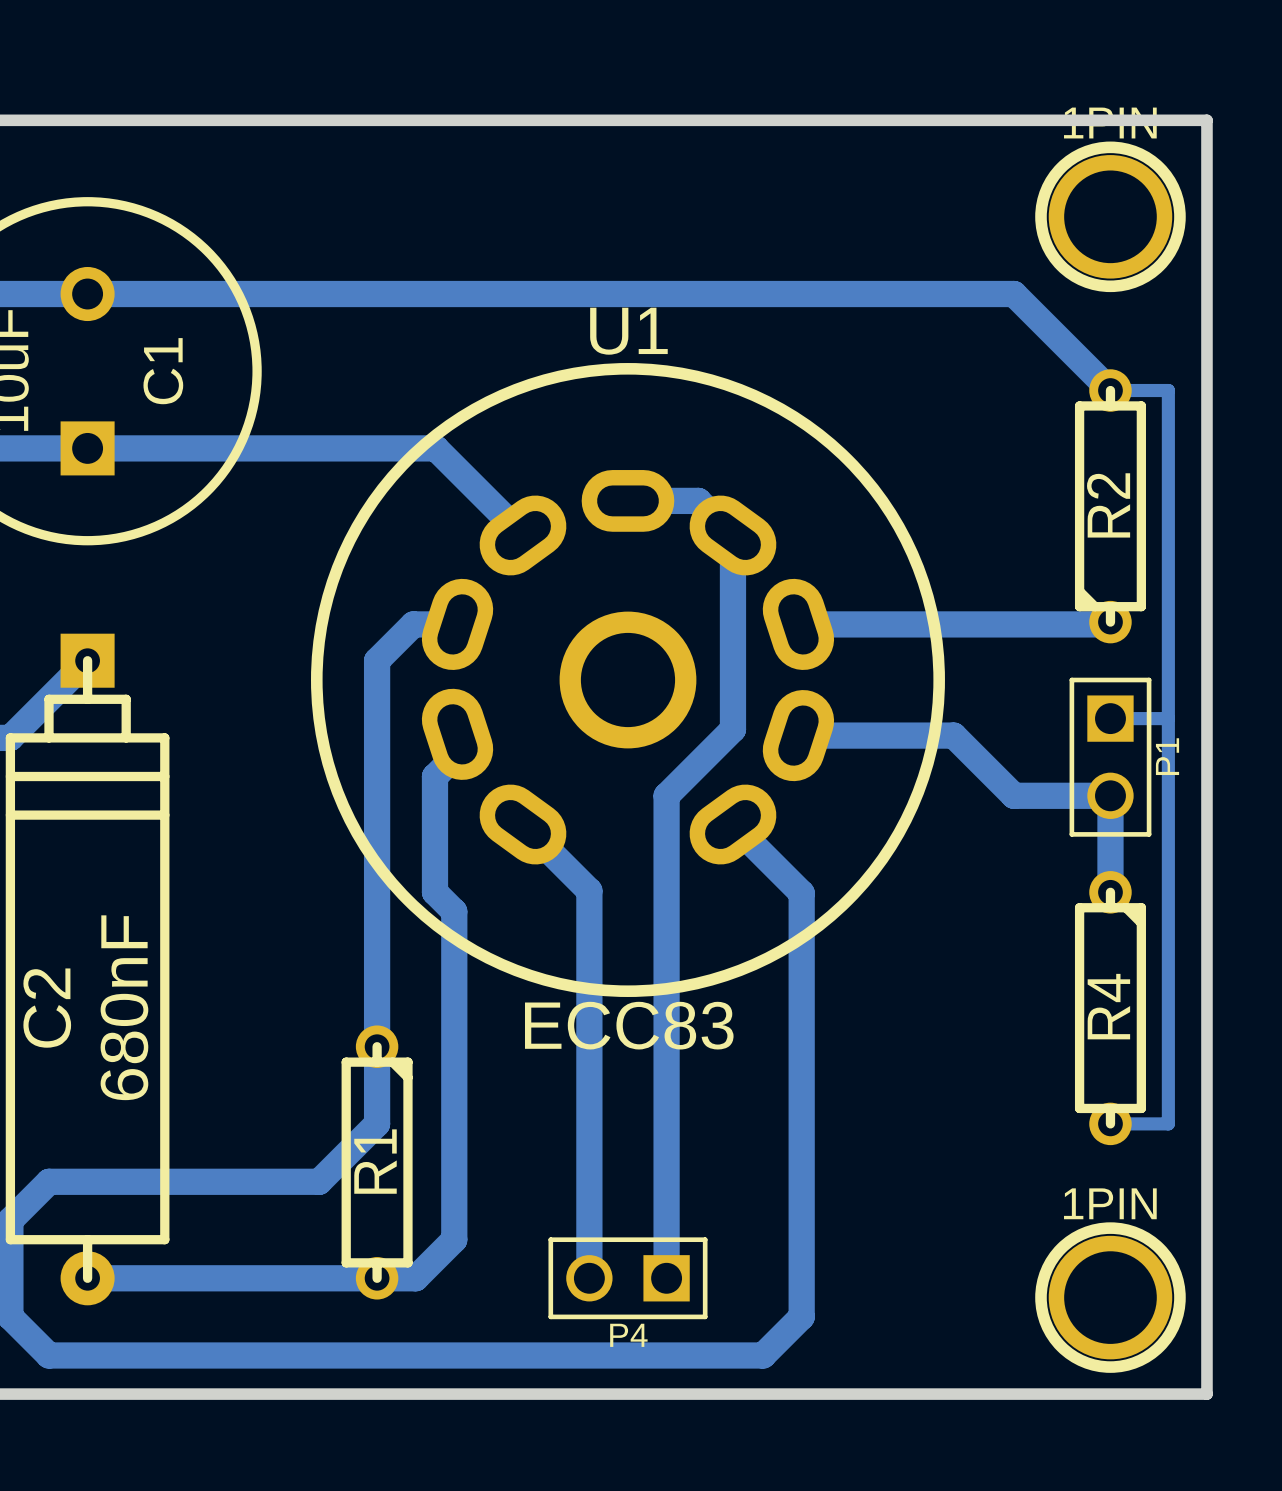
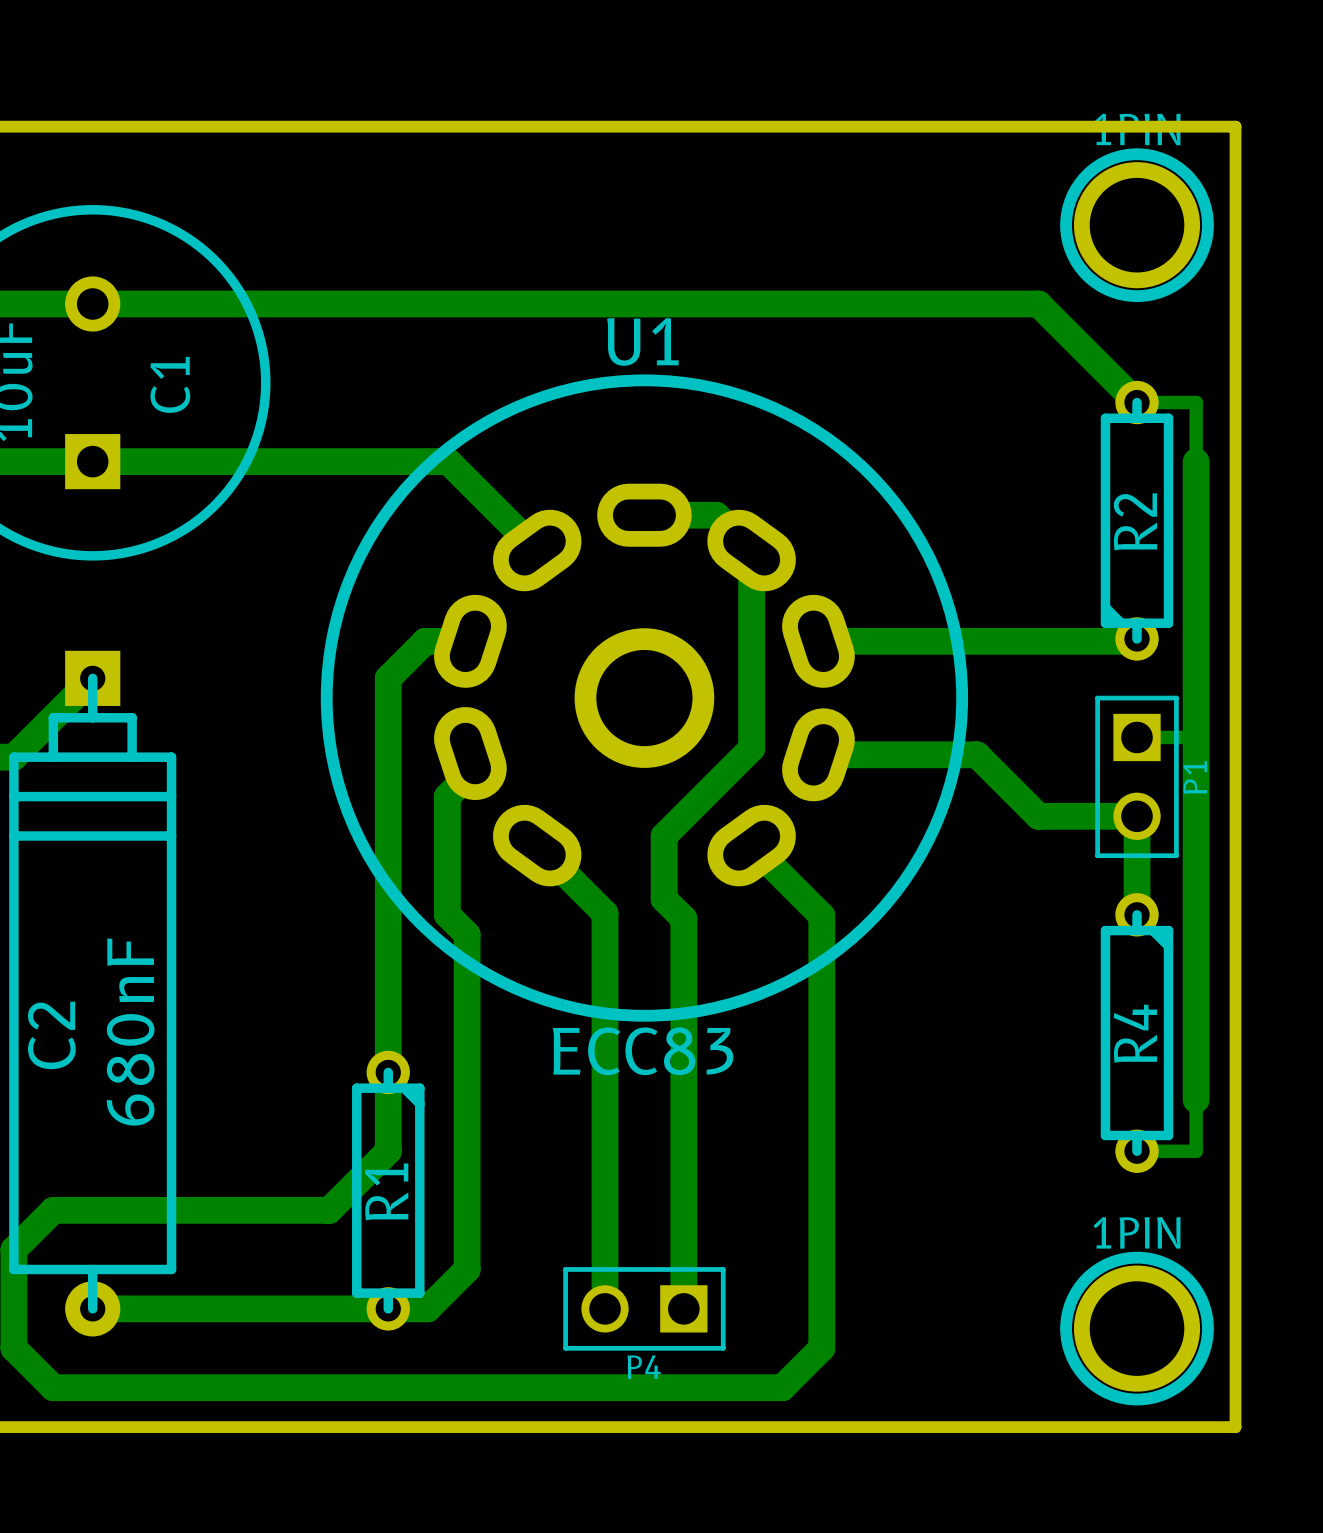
bottom track width: thin (1168, 448) (1168, 1073) -> thick (1196, 461) (1196, 1100)
bottom track: (666, 795) (666, 896) -> (683, 816) (664, 835) (664, 899) (683, 918)

